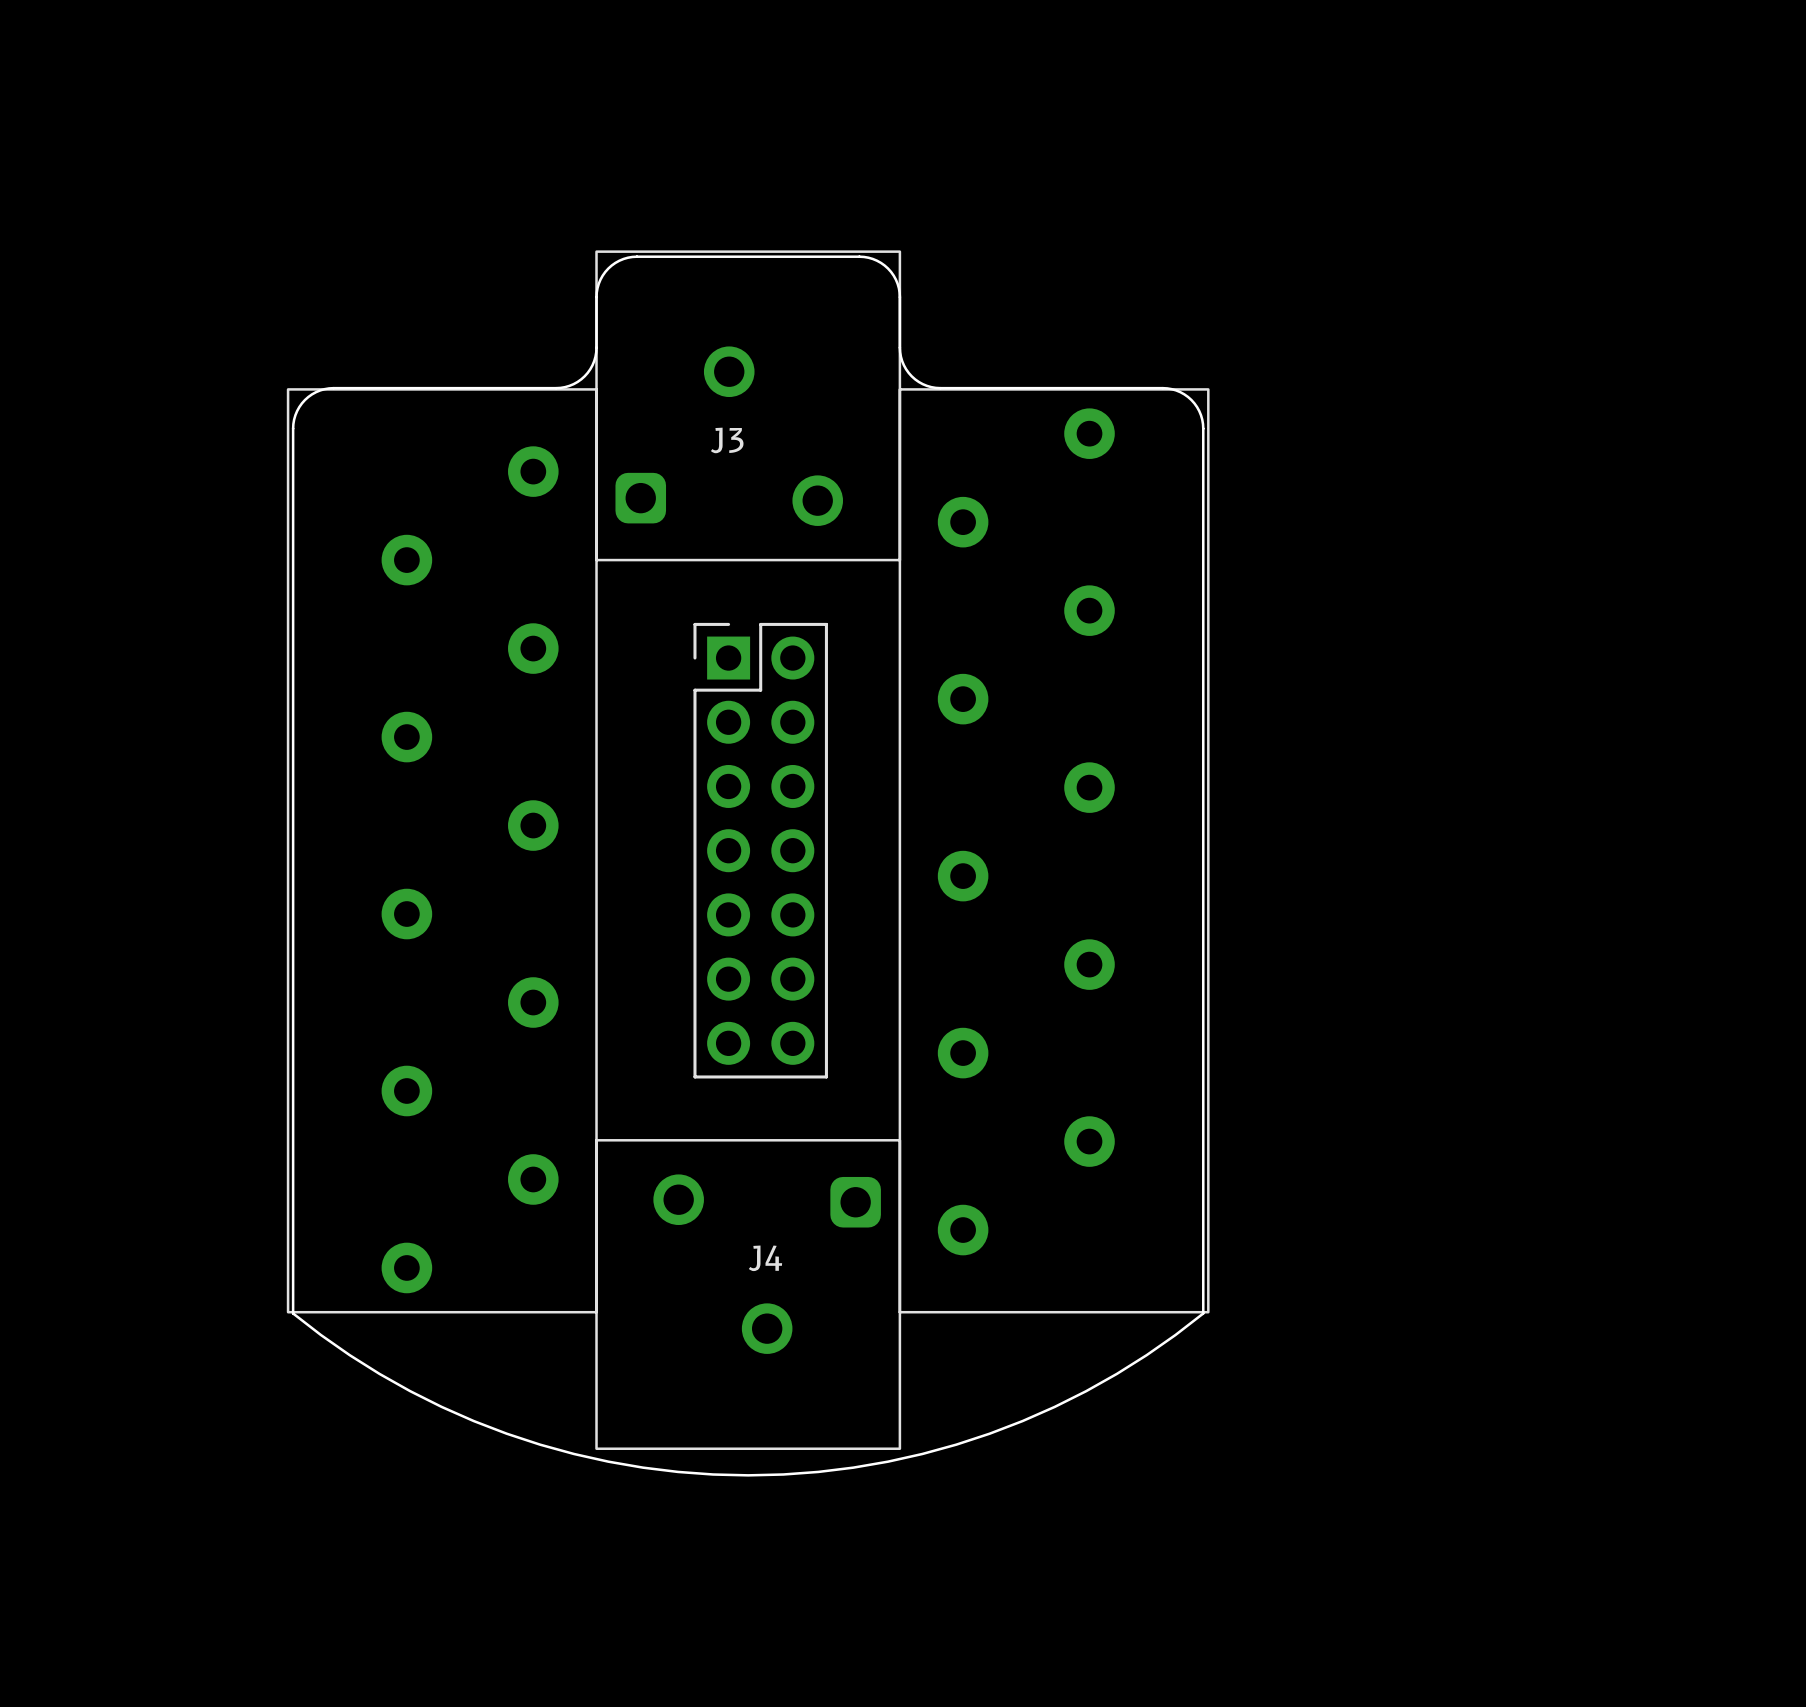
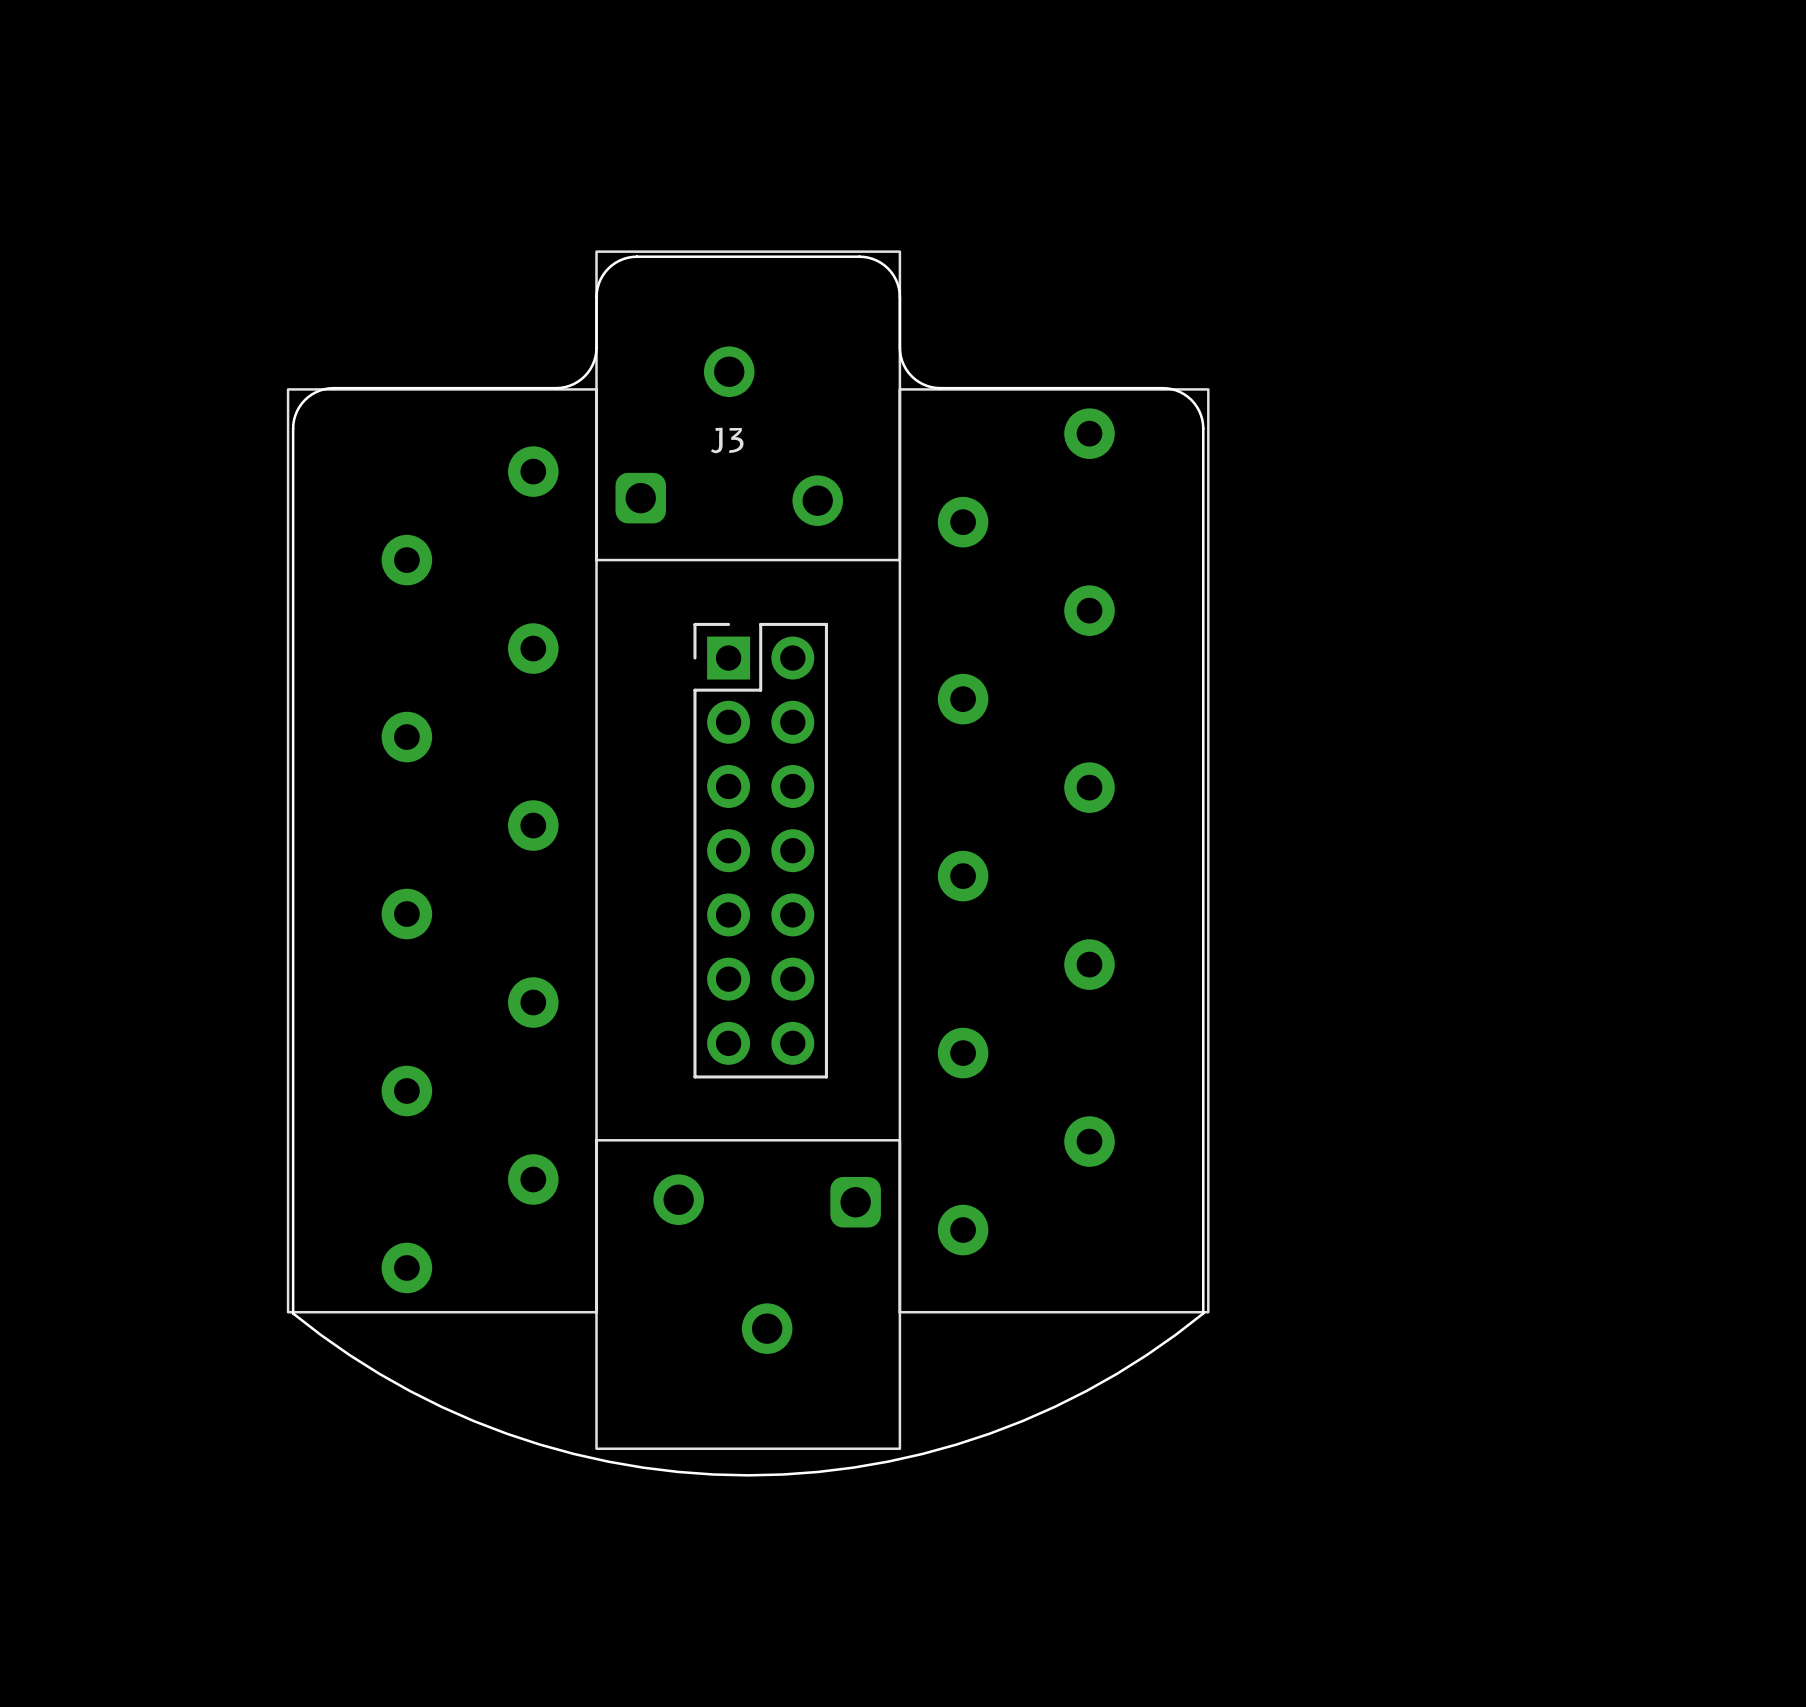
J4 name: J4 (765, 1258) -> none

